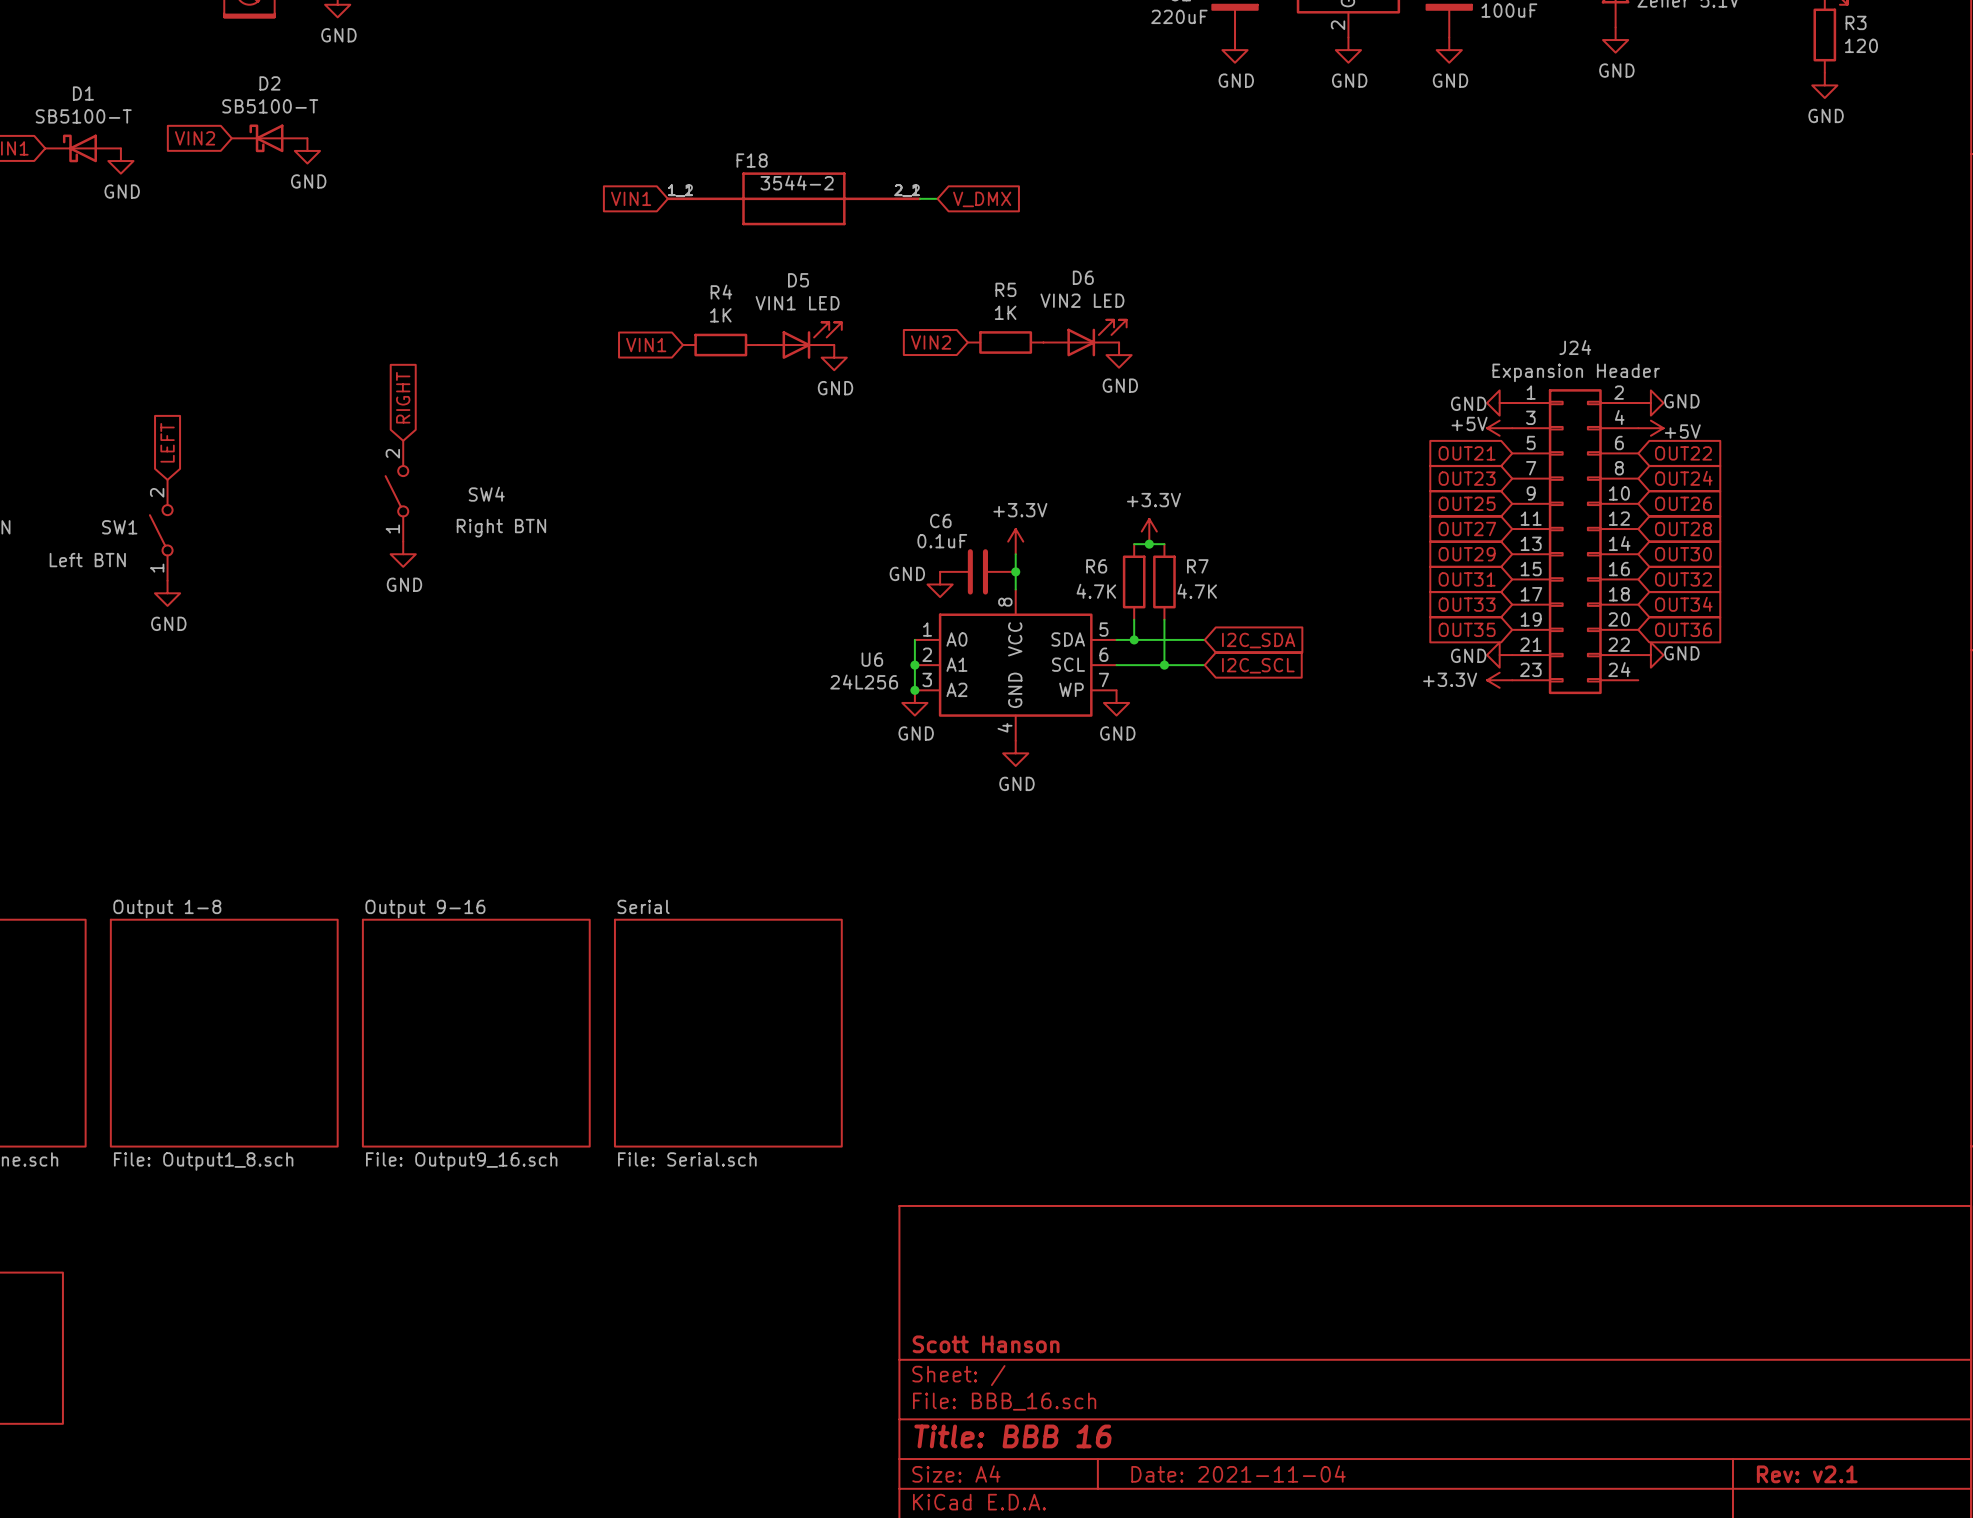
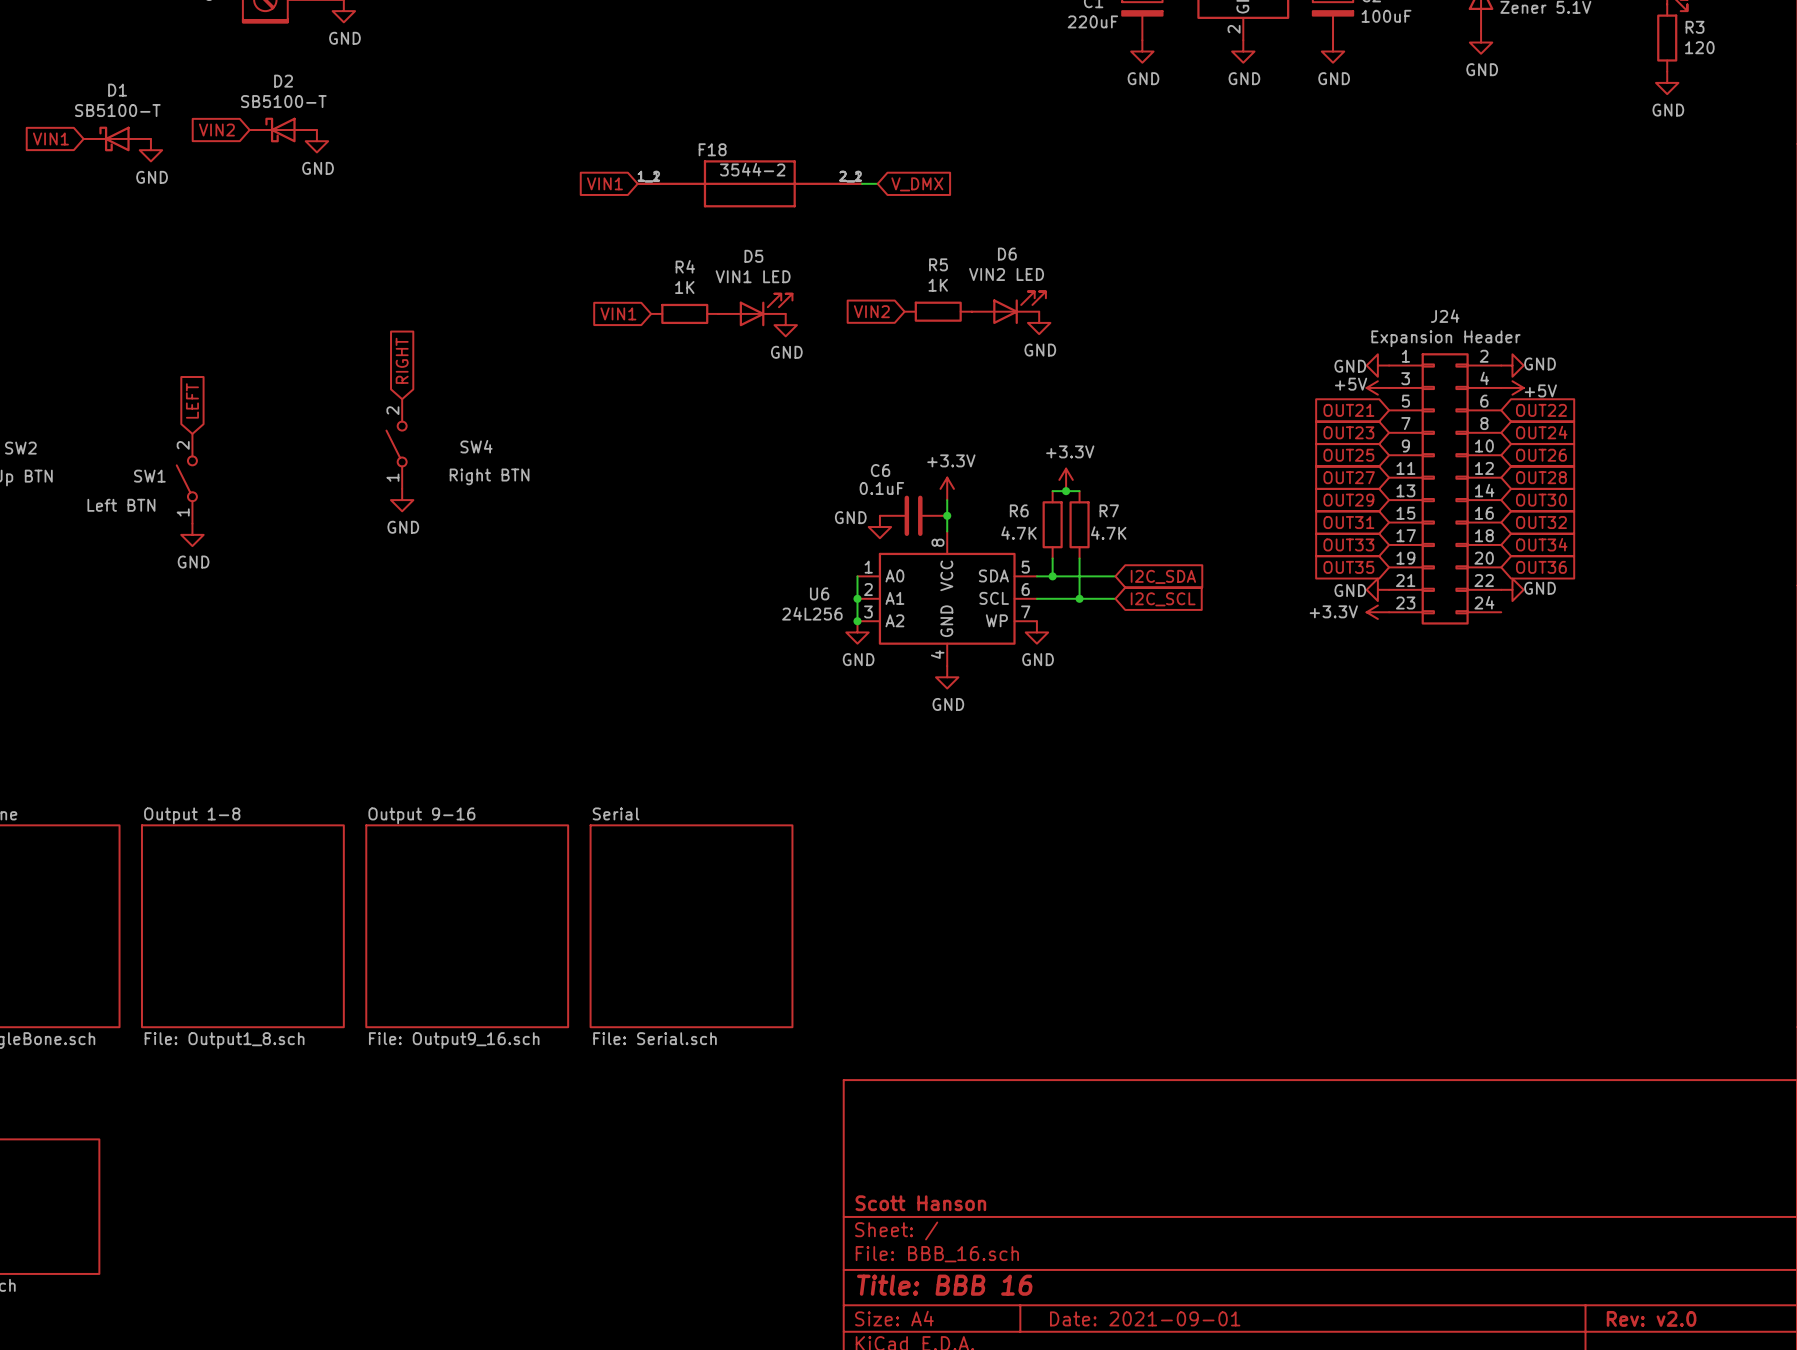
title block: Date: 2021-11-04 (1238, 1473) -> Date: 2021-09-01 (1145, 1318)
title block: Rev: v2.1 (1807, 1474) -> Rev: v2.0 (1651, 1318)

